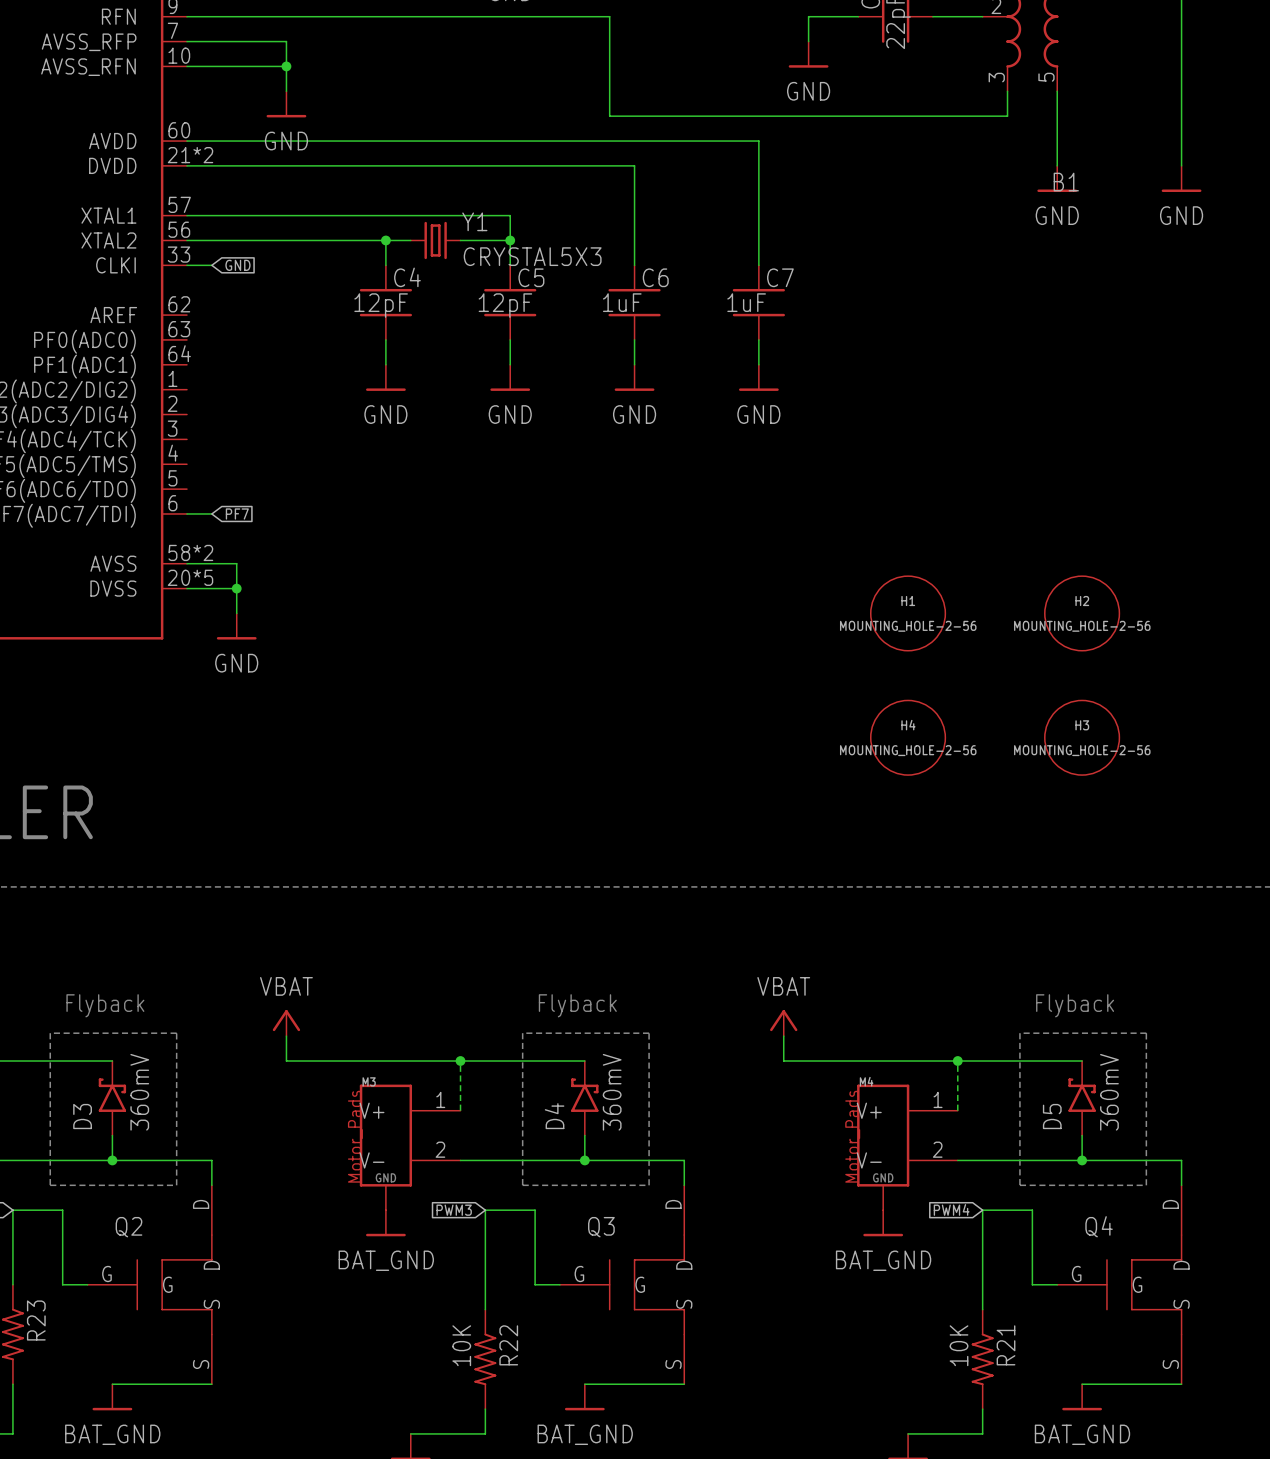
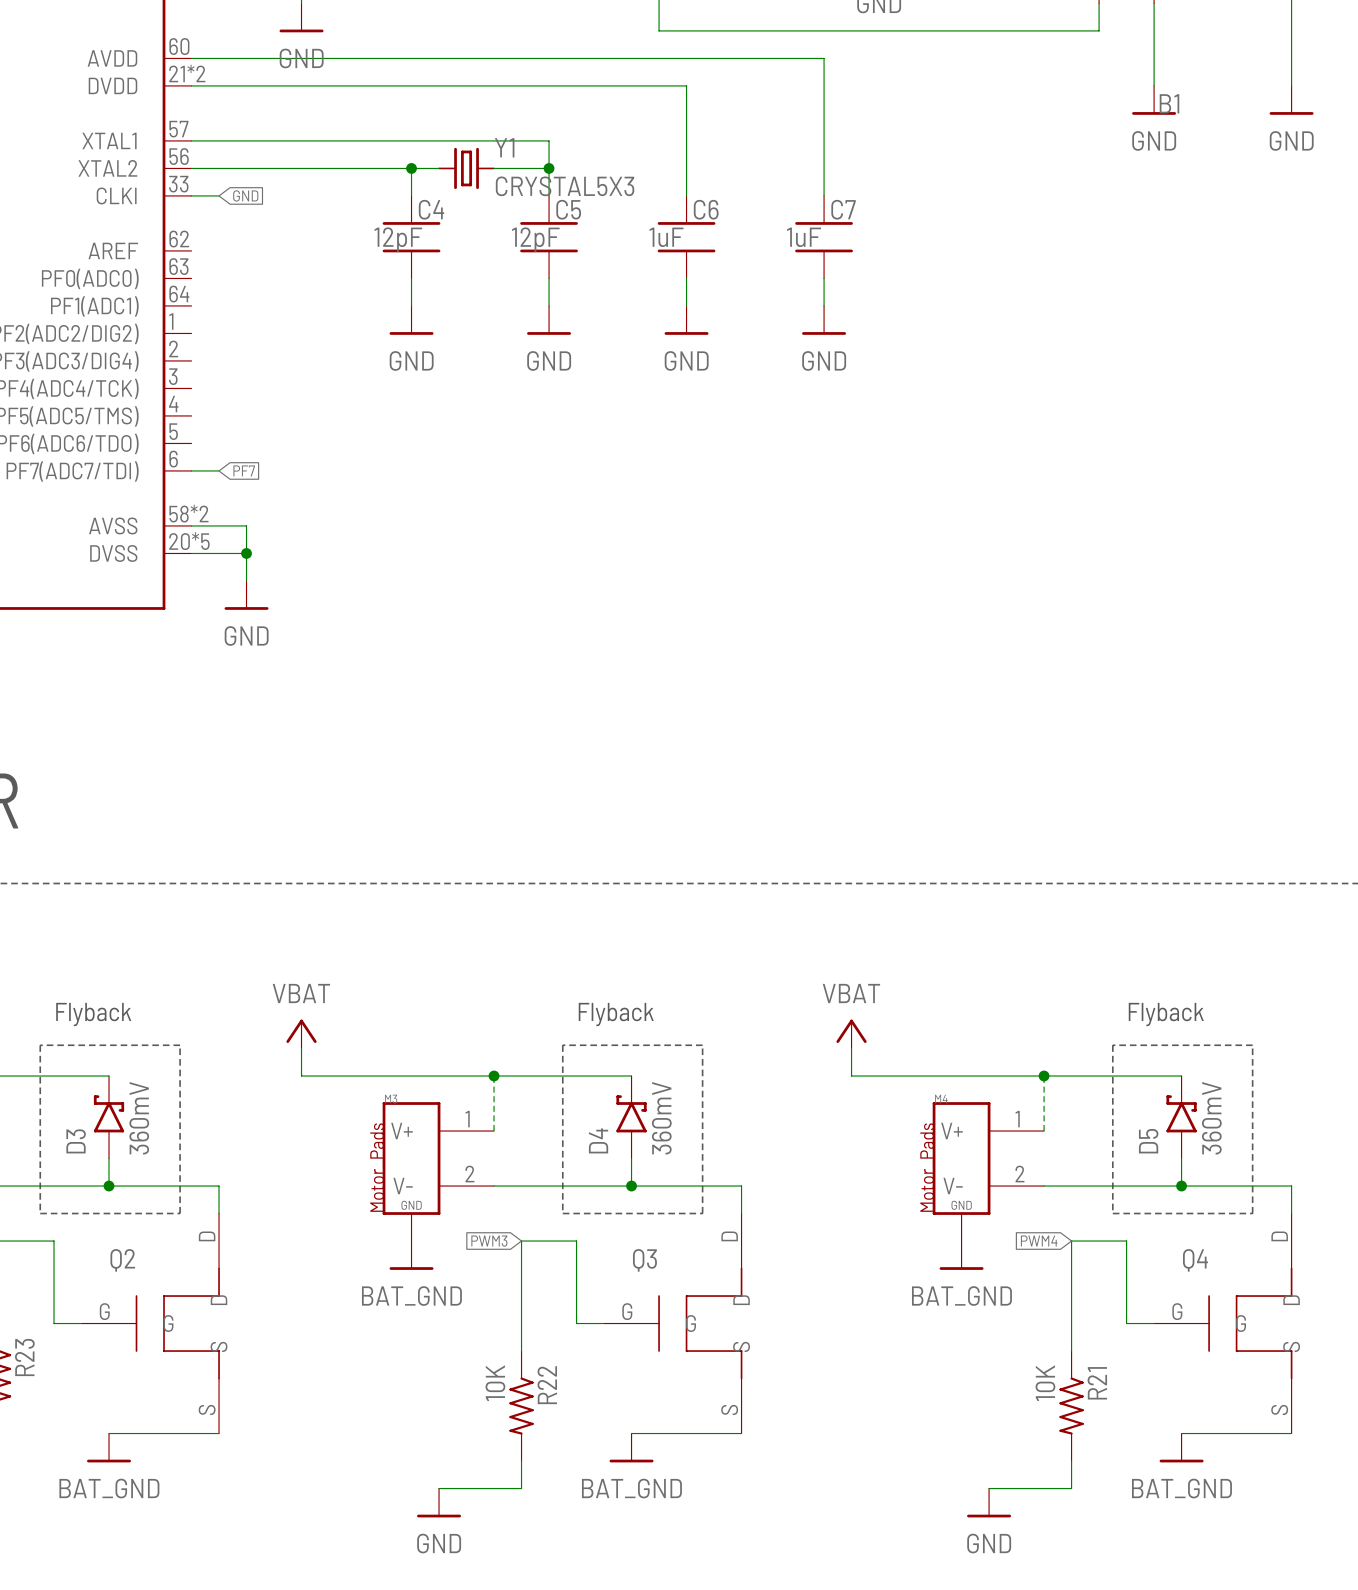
H1: MOUNTING_HOLE-2-56 (908, 613) -> none
H2: MOUNTING_HOLE-2-56 (1082, 613) -> none
H4: MOUNTING_HOLE-2-56 (908, 737) -> none
H3: MOUNTING_HOLE-2-56 (1082, 737) -> none

